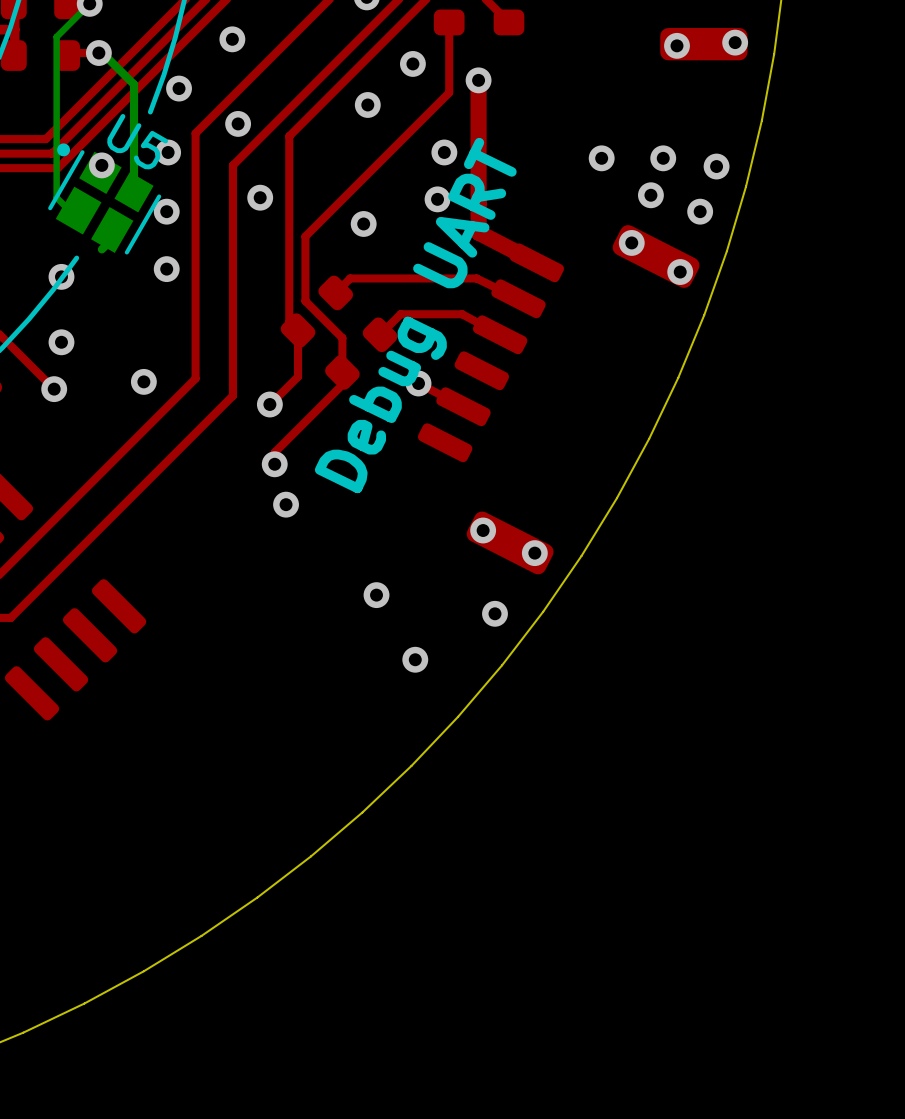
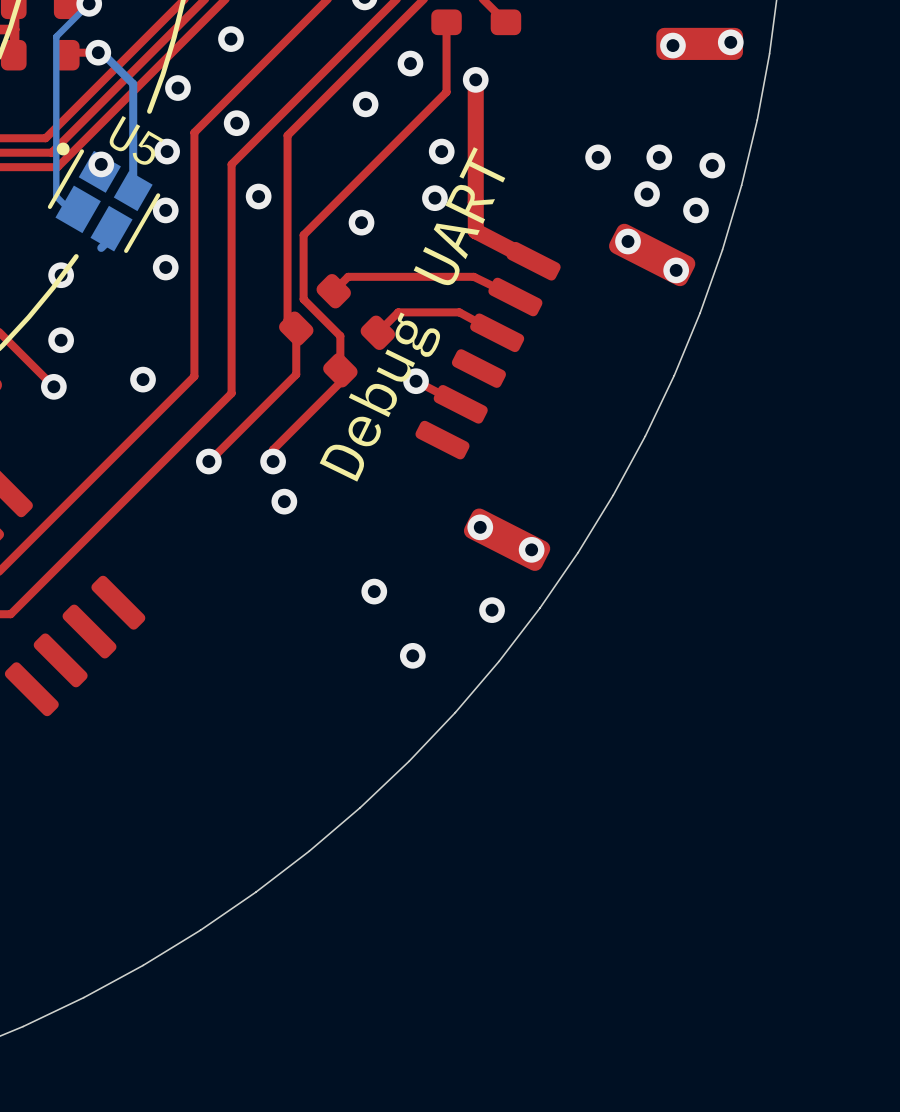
via position: (269, 404) -> (208, 461)
top track: none -> (268, 402) (209, 461)

